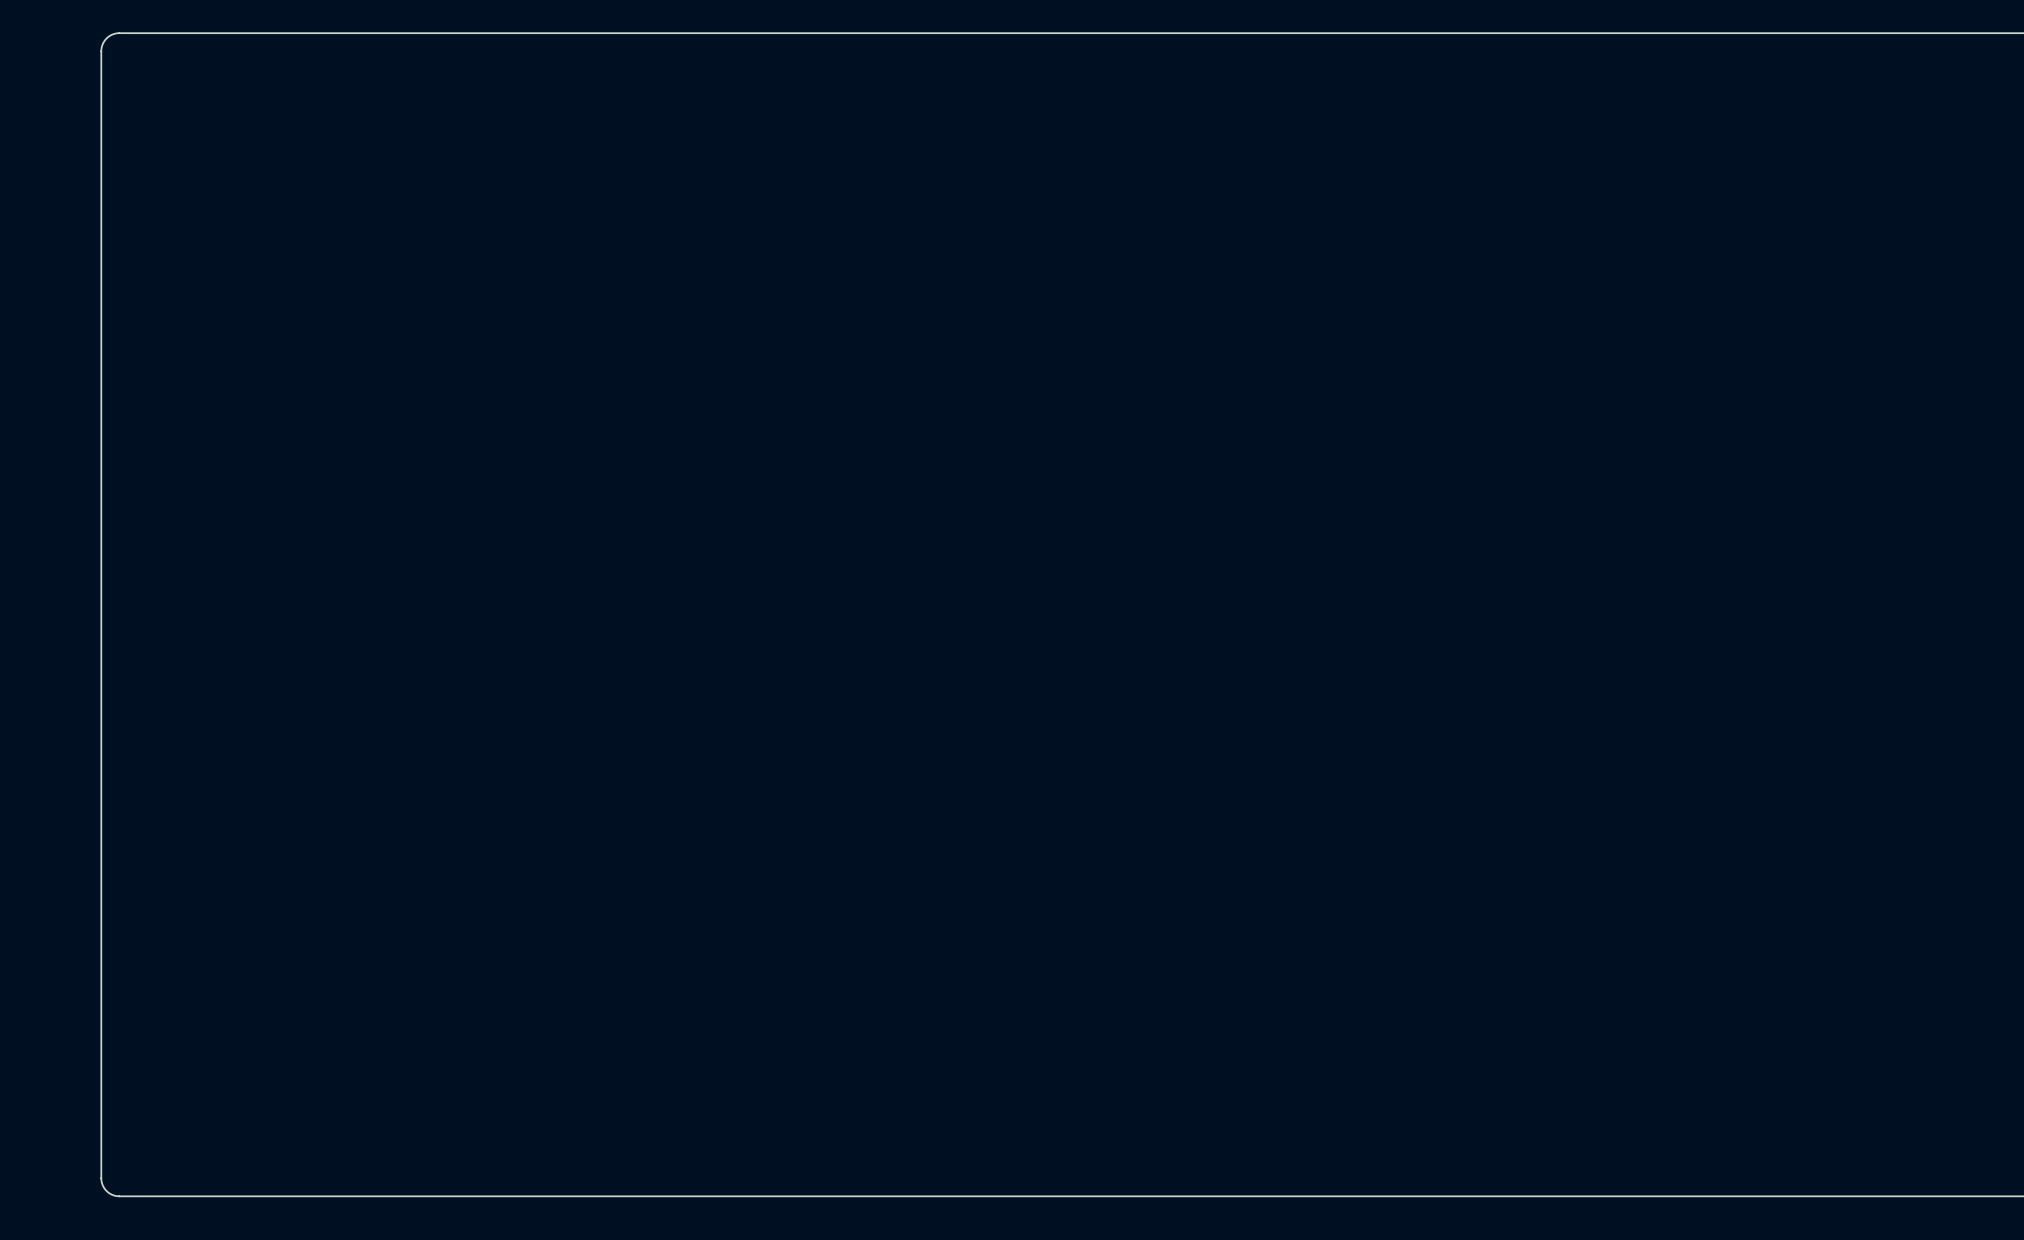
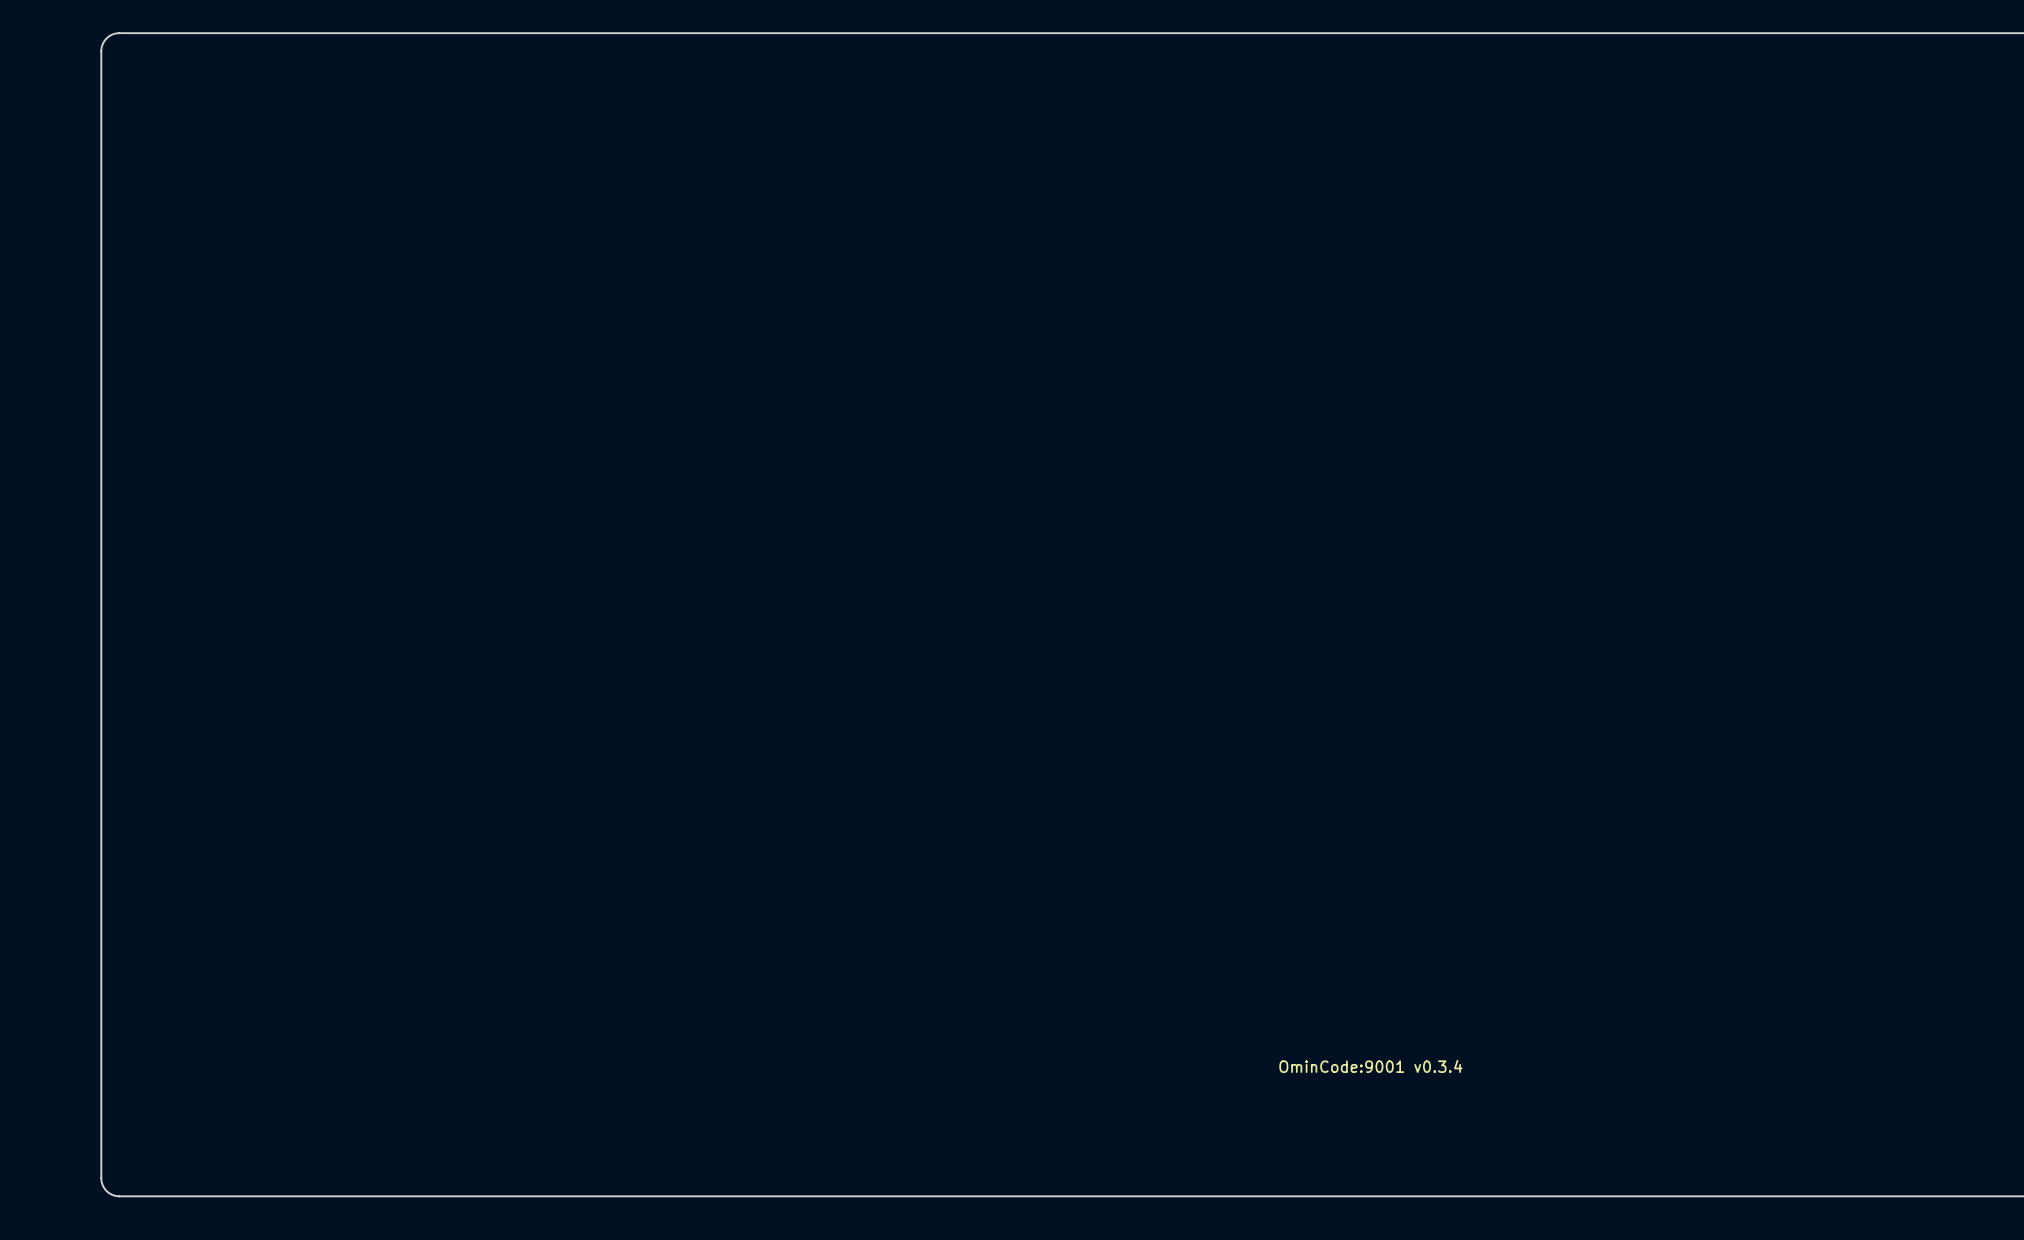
text: none -> OminCode:9001 v0.3.4 (1370, 1066)

